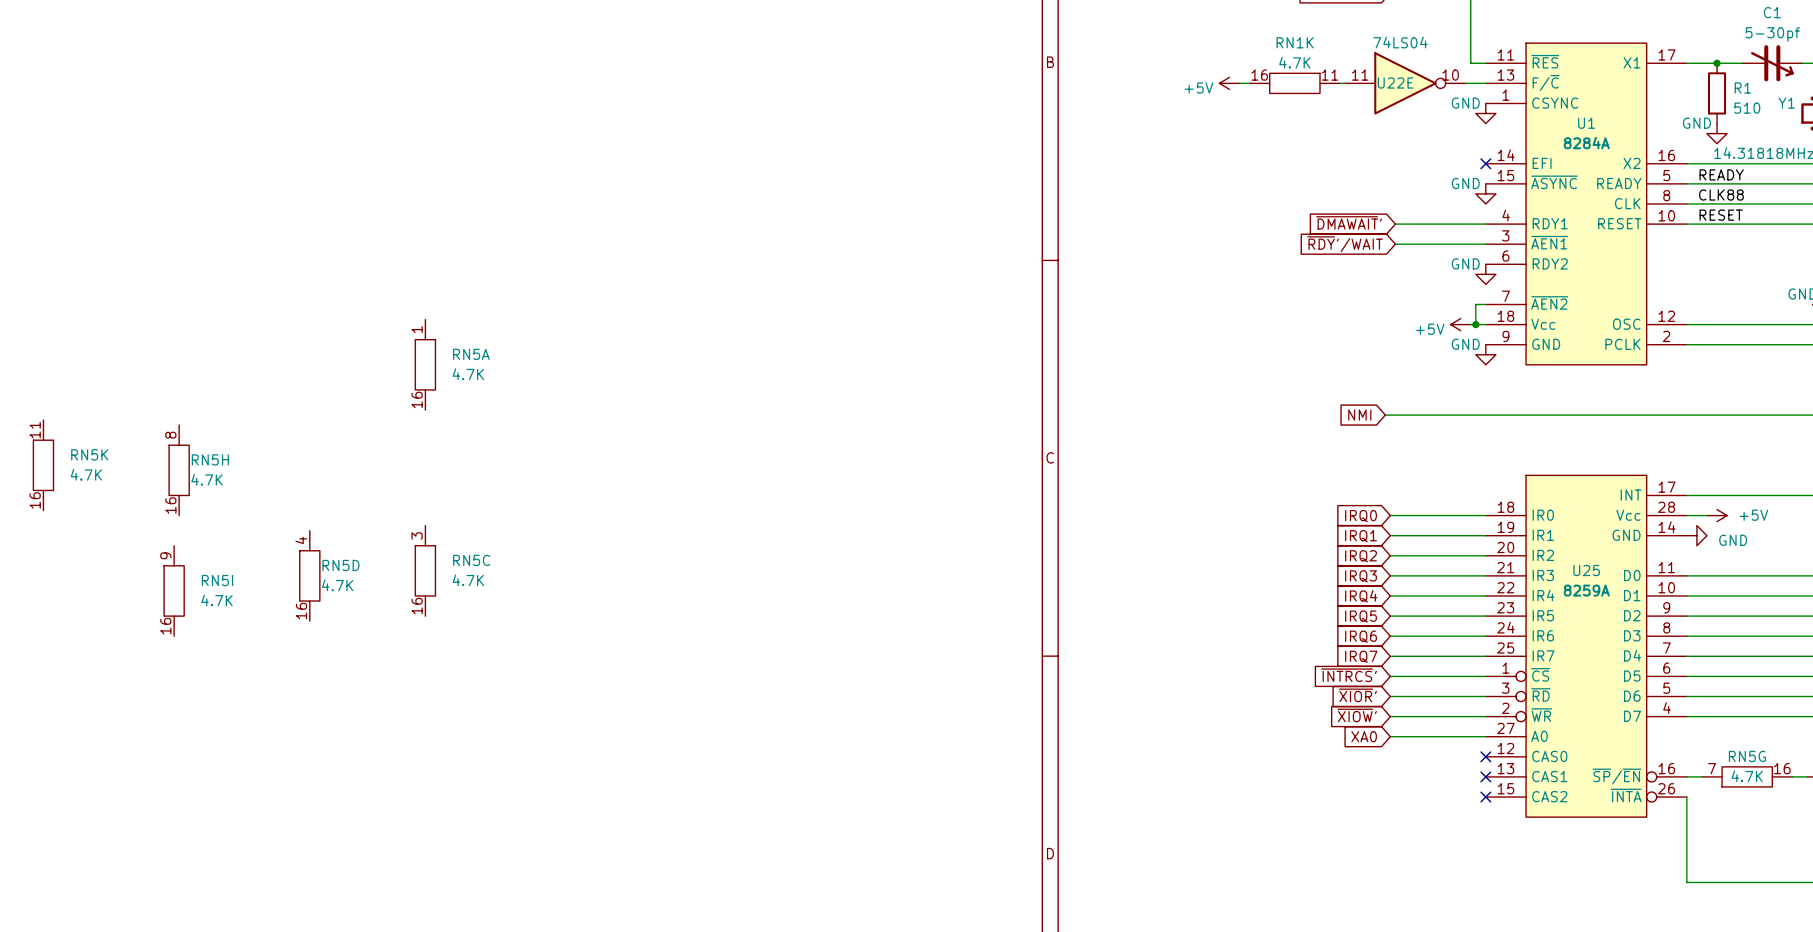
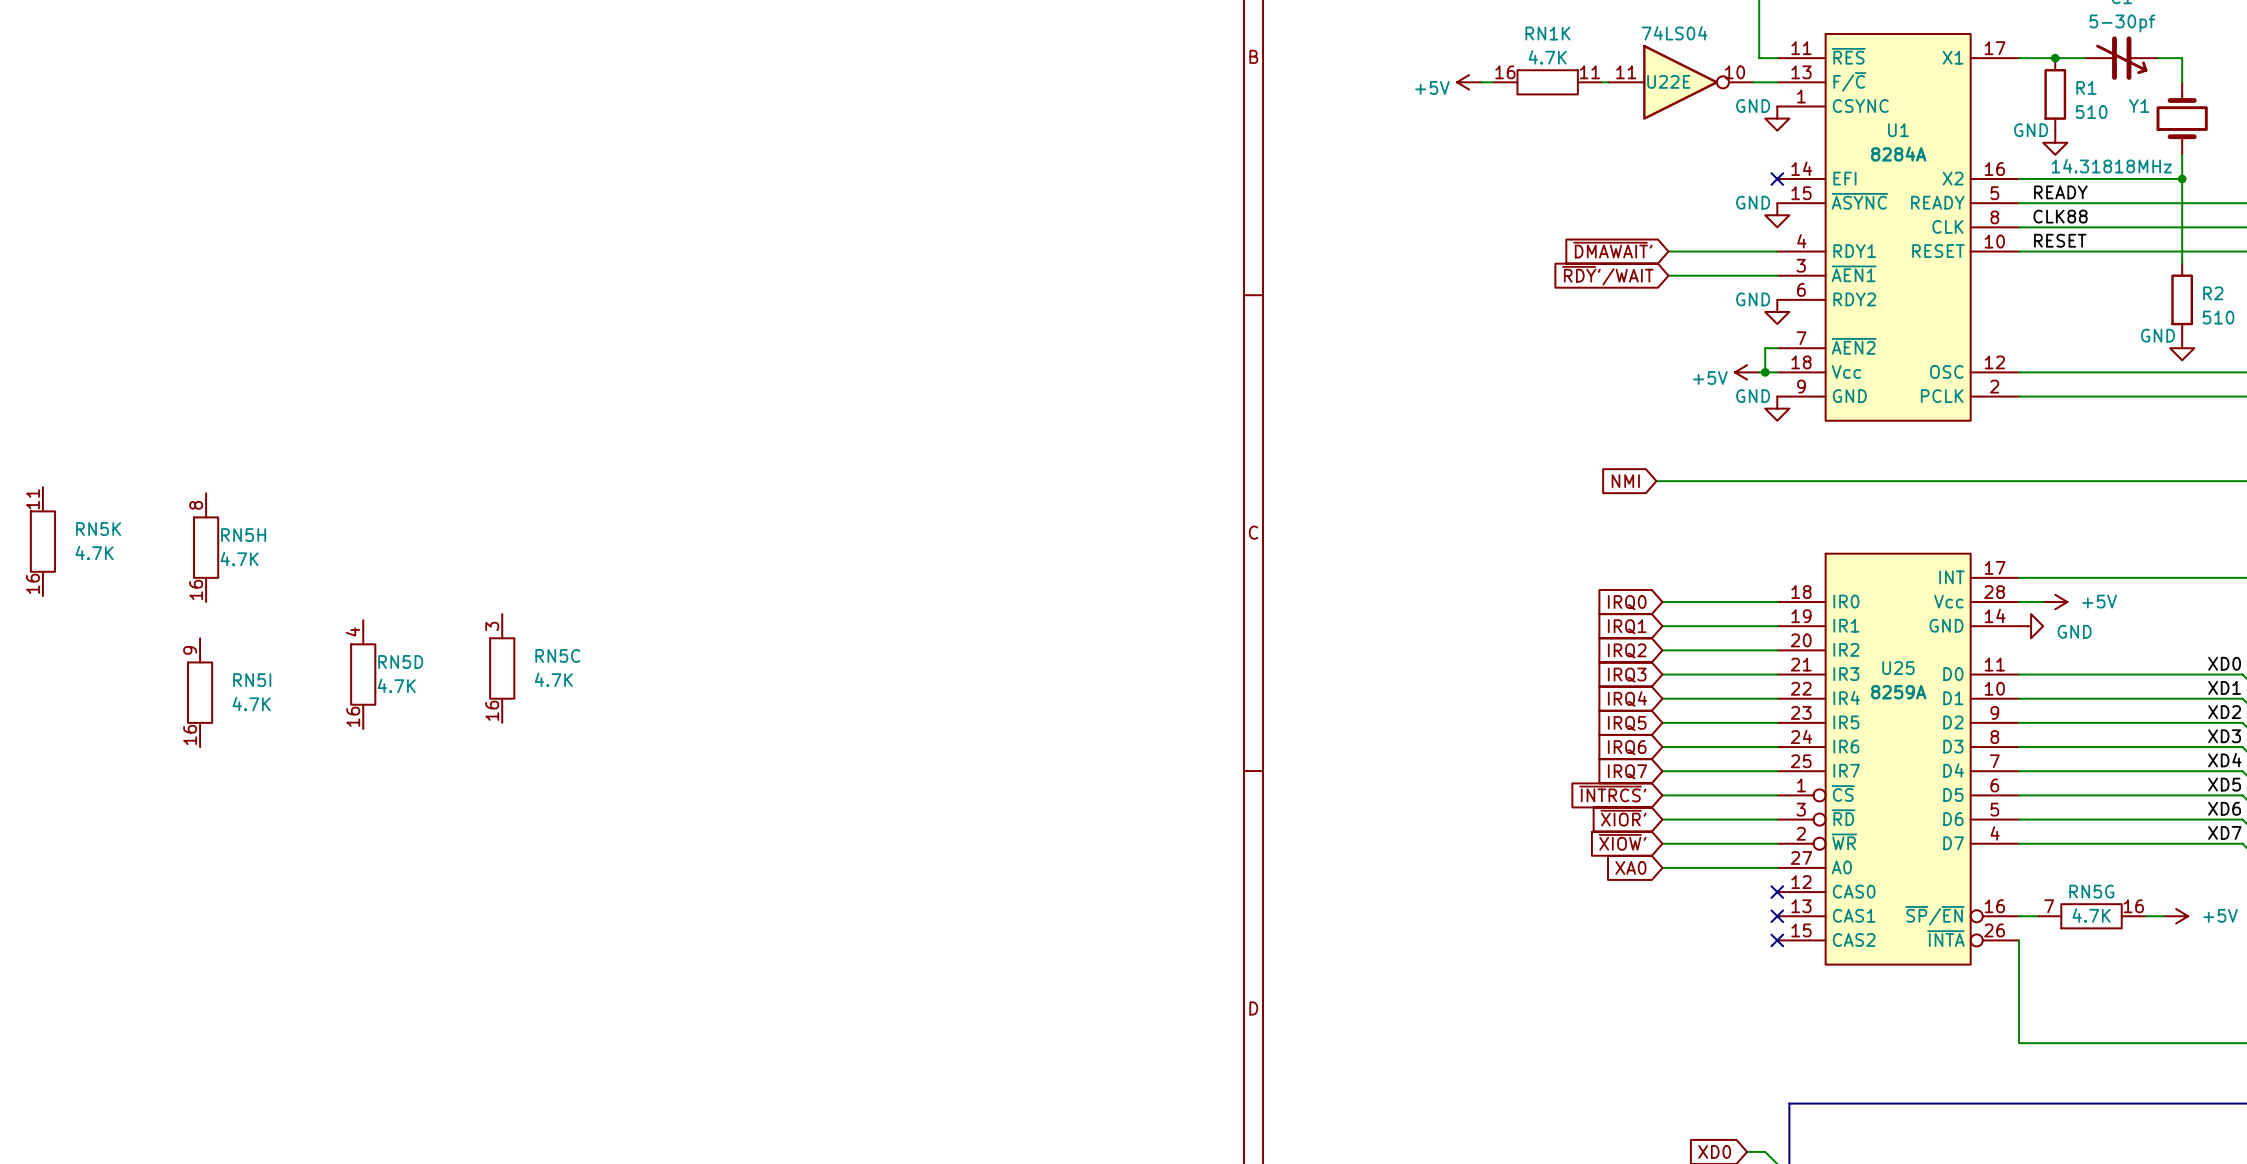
RN5A: 4.7K (425, 364) -> none

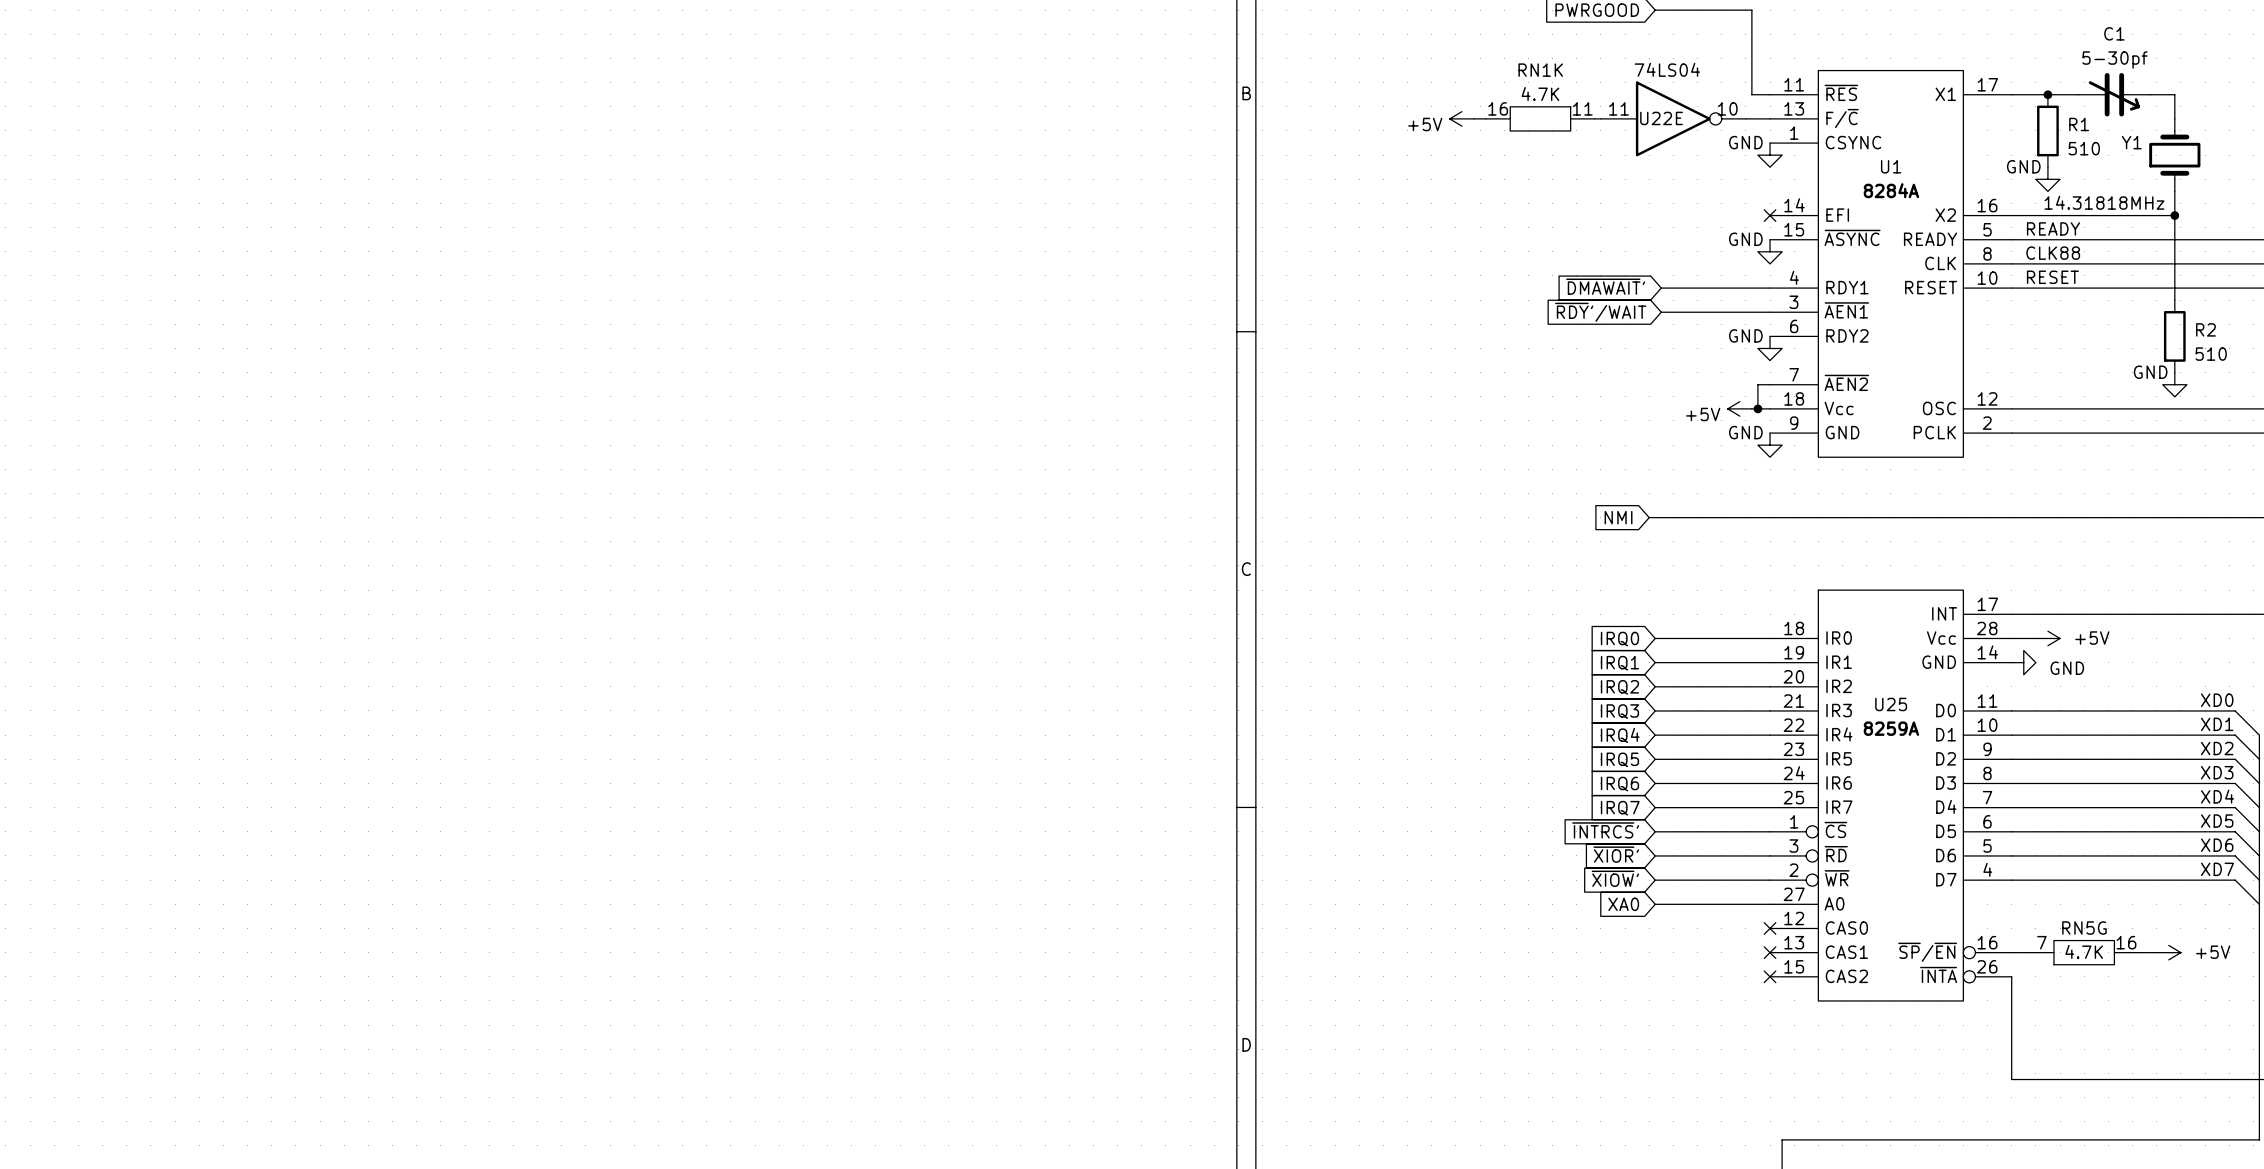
RN5K: 4.7K (42, 541) -> none
RN5H: 4.7K (206, 547) -> none
RN5C: 4.7K (502, 668) -> none
RN5D: 4.7K (363, 674) -> none
RN5I: 4.7K (200, 692) -> none

